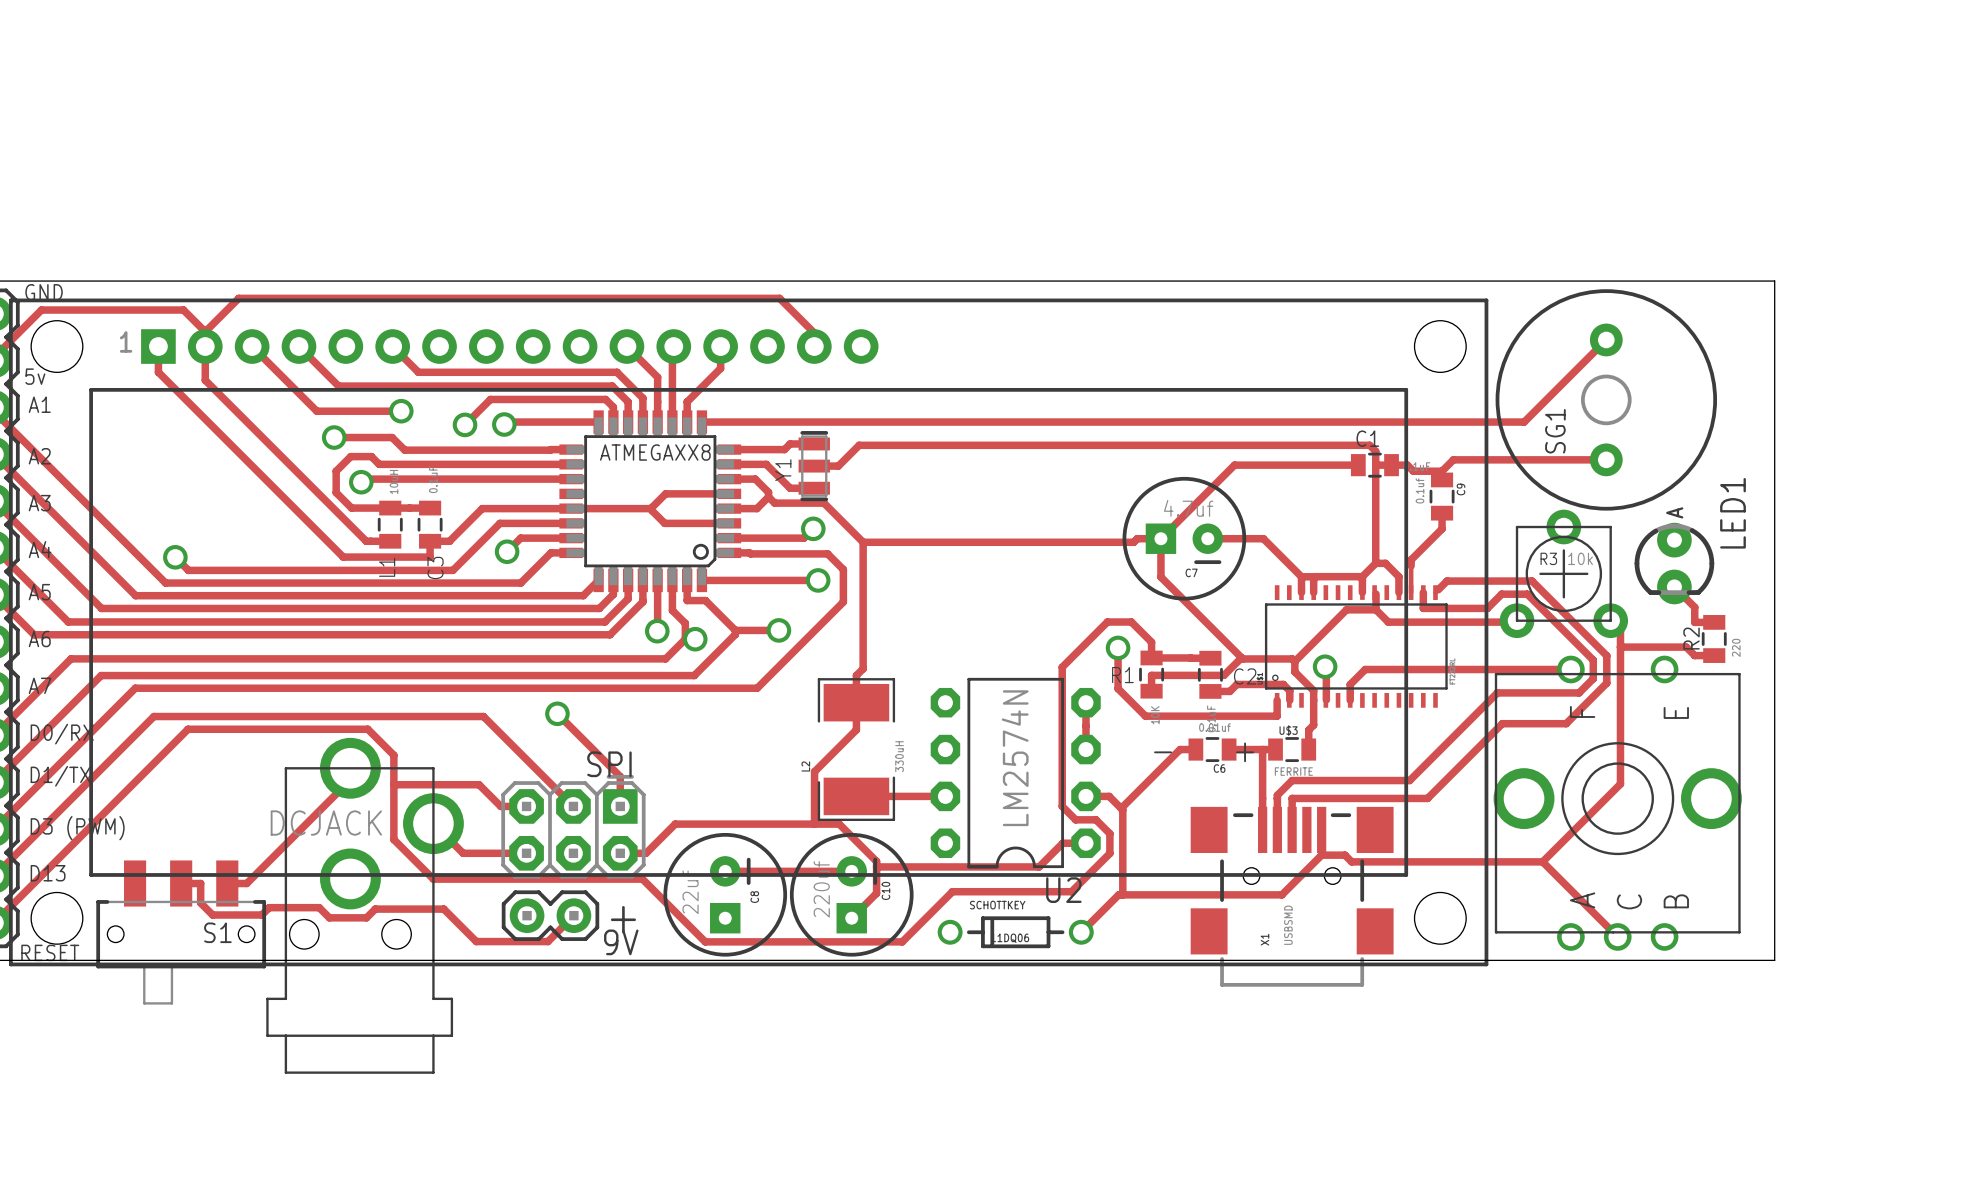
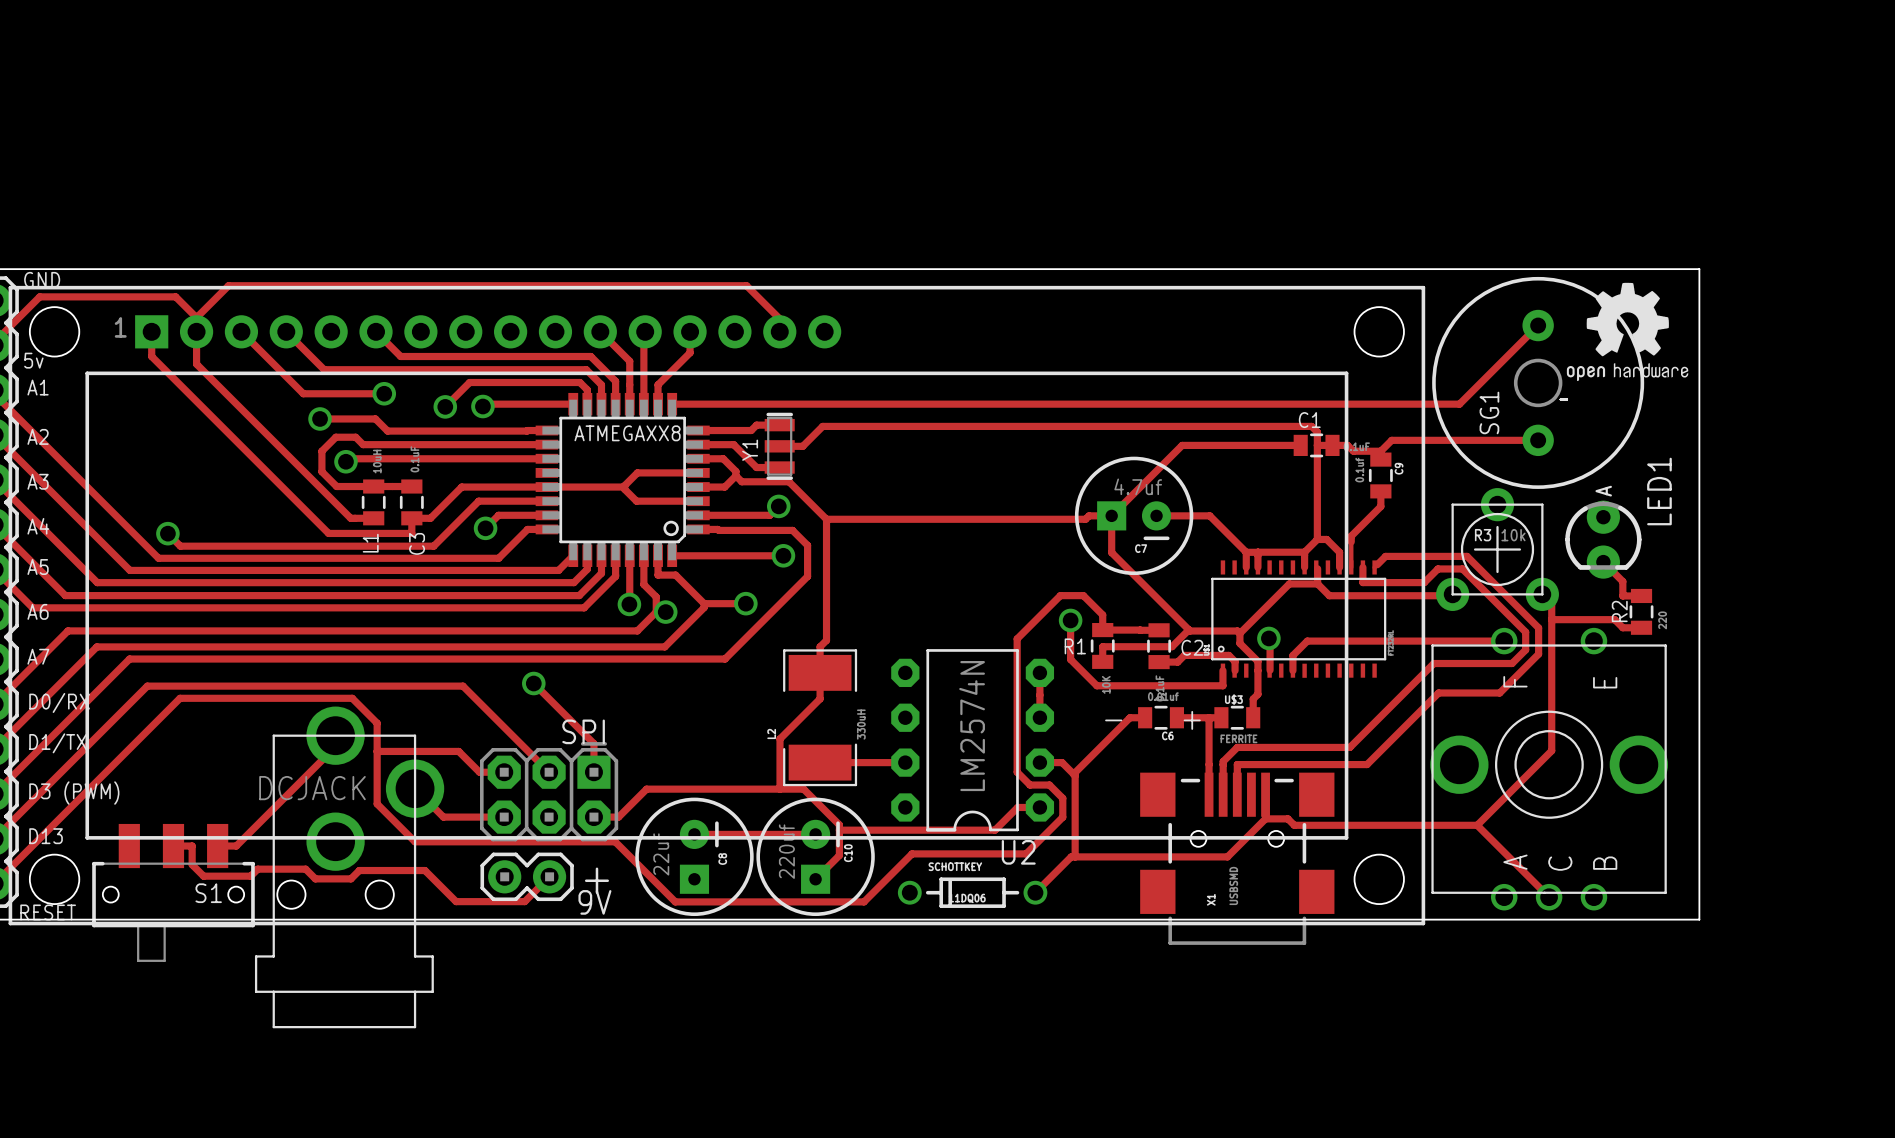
drawing: none -> [1566, 282, 1689, 382]

